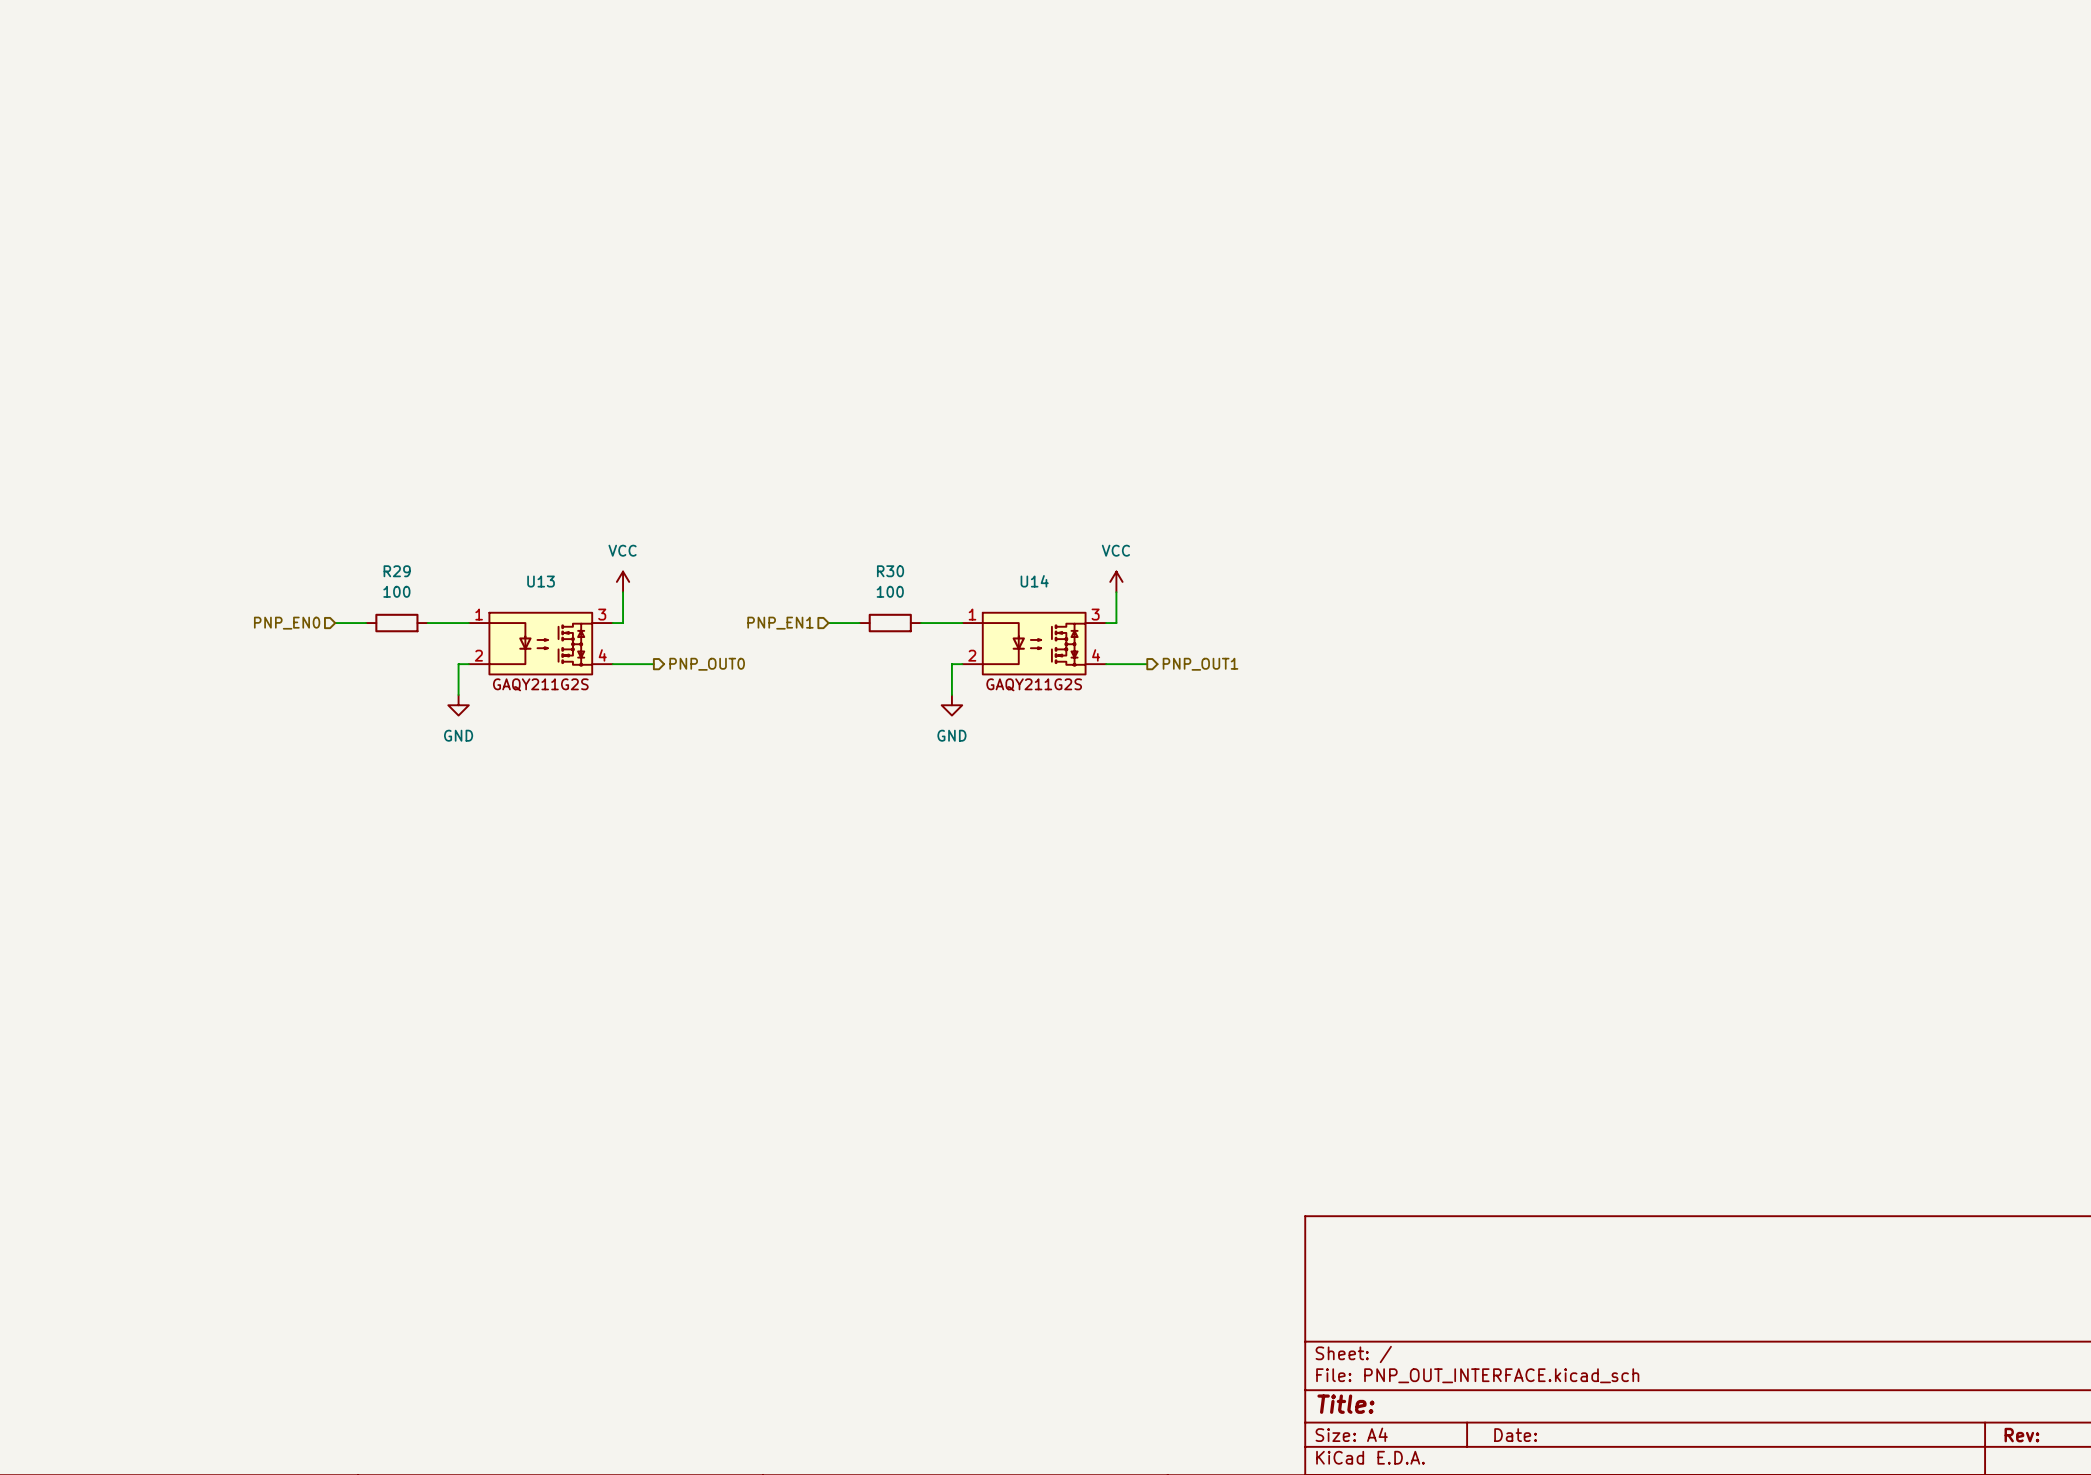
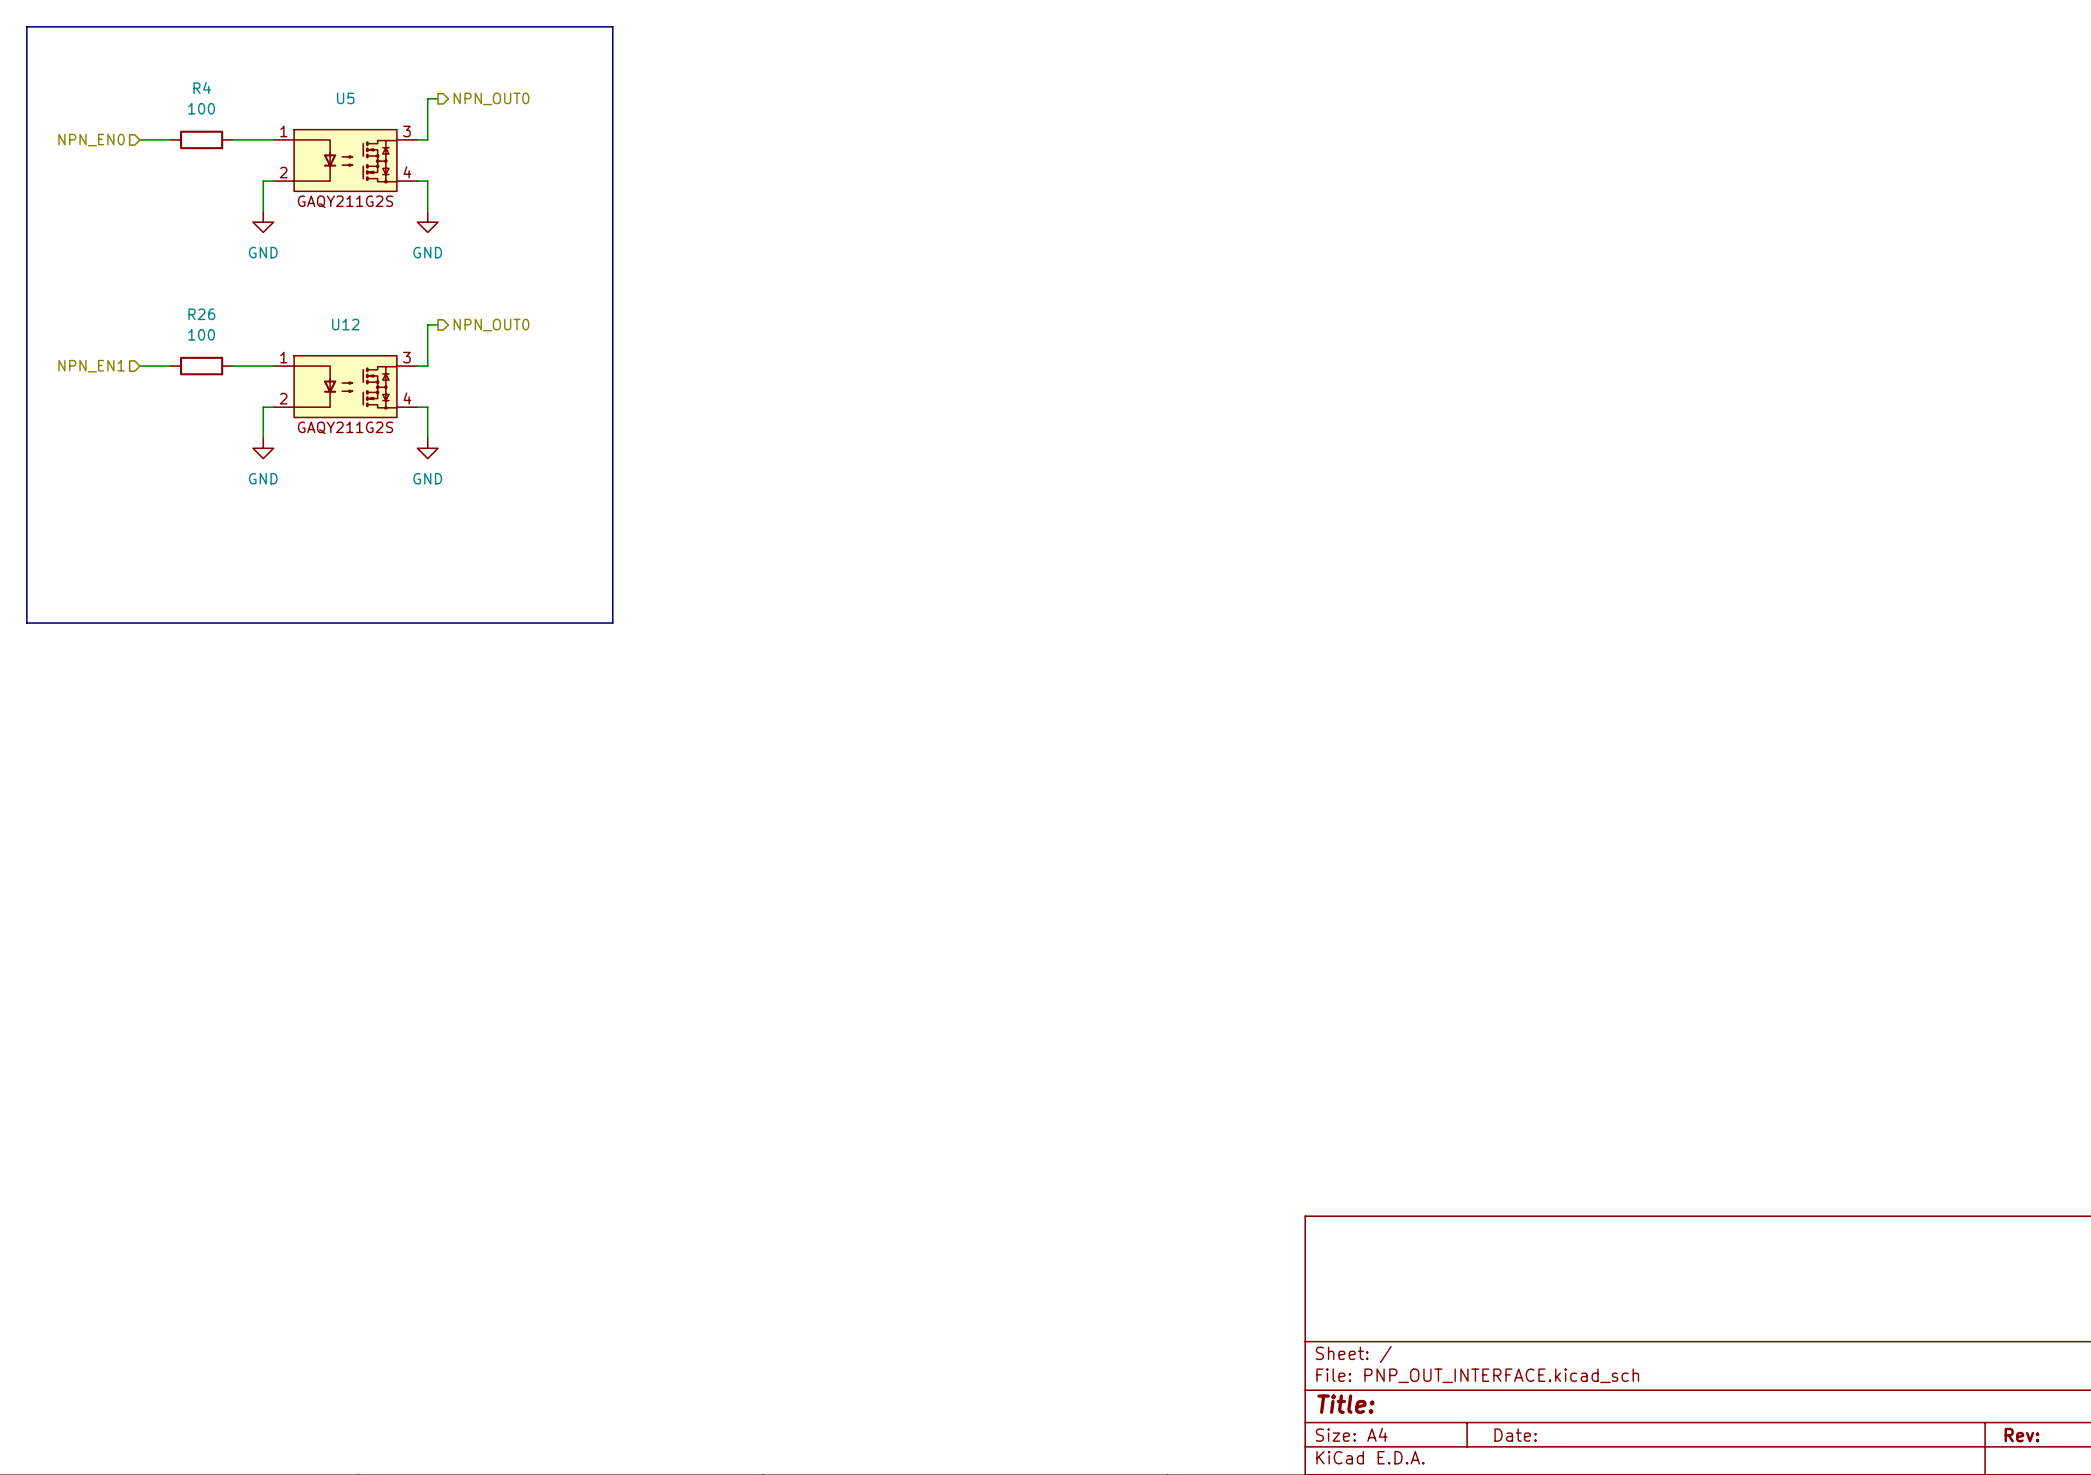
line: none -> (26, 26) (612, 26) (612, 623) (26, 623) (26, 26)
wire: none -> (438, 98) (427, 98) (427, 139) (417, 139)
hierarchical label: none -> NPN_OUT0 (491, 98)
wire: none -> (139, 139) (170, 139)
R4: none -> 100 (201, 139)
wire: none -> (232, 139) (273, 139)
hierarchical label: none -> NPN_EN0 (91, 140)
U5: none -> (345, 160)
wire: none -> (273, 181) (263, 181) (263, 211)
wire: none -> (417, 181) (427, 181) (427, 211)
power symbol: none -> GND (263, 222)
power symbol: none -> GND (427, 222)
wire: none -> (438, 324) (427, 324) (427, 366) (417, 366)
hierarchical label: none -> NPN_OUT0 (491, 325)
hierarchical label: none -> NPN_EN1 (91, 366)
wire: none -> (139, 366) (170, 366)
R26: none -> 100 (201, 366)
wire: none -> (232, 366) (273, 366)
U12: none -> (345, 386)
wire: none -> (273, 407) (263, 407) (263, 438)
wire: none -> (417, 407) (427, 407) (427, 438)
power symbol: none -> GND (263, 448)
power symbol: none -> GND (427, 448)
power symbol: VCC (623, 581) -> none
power symbol: VCC (1116, 581) -> none
wire: (623, 592) (623, 623) (612, 623) -> none
wire: (1116, 592) (1116, 623) (1106, 623) -> none
hierarchical label: PNP_EN0 (287, 623) -> none
R29: 100 (396, 623) -> none
hierarchical label: PNP_EN1 (780, 623) -> none
wire: (828, 623) (859, 623) -> none
R30: 100 (890, 623) -> none
wire: (921, 623) (962, 623) -> none
U13: (540, 643) -> none
U14: (1034, 643) -> none
wire: (468, 664) (458, 664) (458, 694) -> none
wire: (612, 664) (653, 664) -> none
hierarchical label: PNP_OUT0 (707, 664) -> none
wire: (962, 664) (951, 664) (951, 694) -> none
wire: (1106, 664) (1147, 664) -> none
hierarchical label: PNP_OUT1 (1200, 664) -> none
power symbol: GND (458, 705) -> none
power symbol: GND (951, 705) -> none

